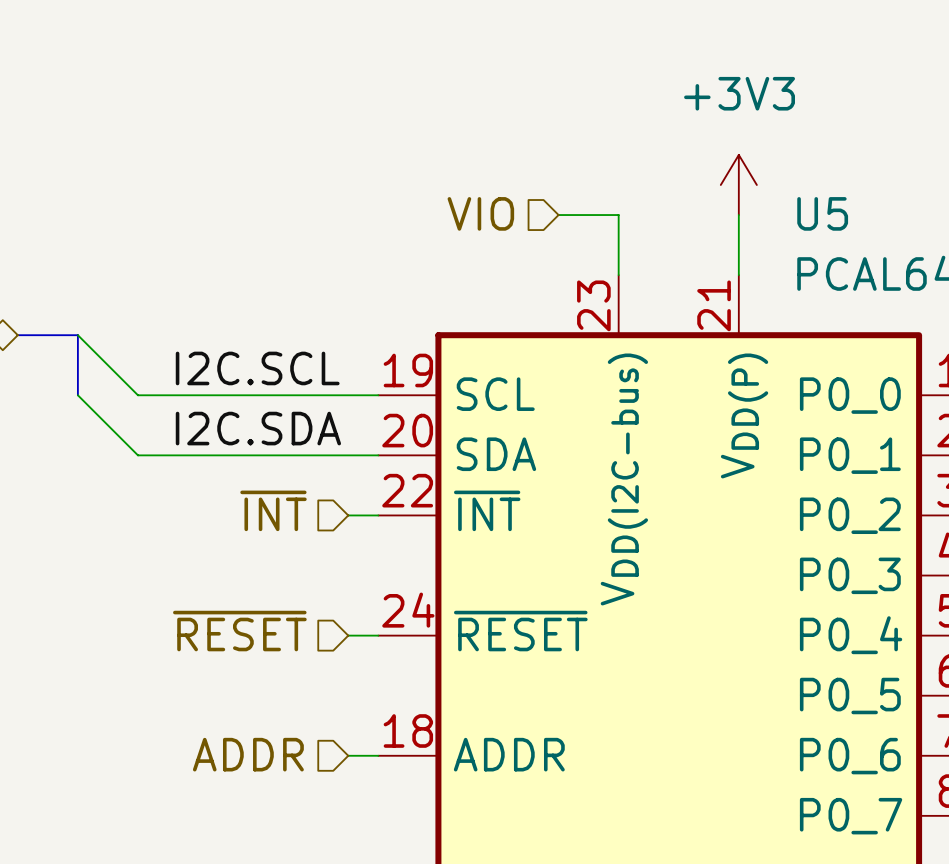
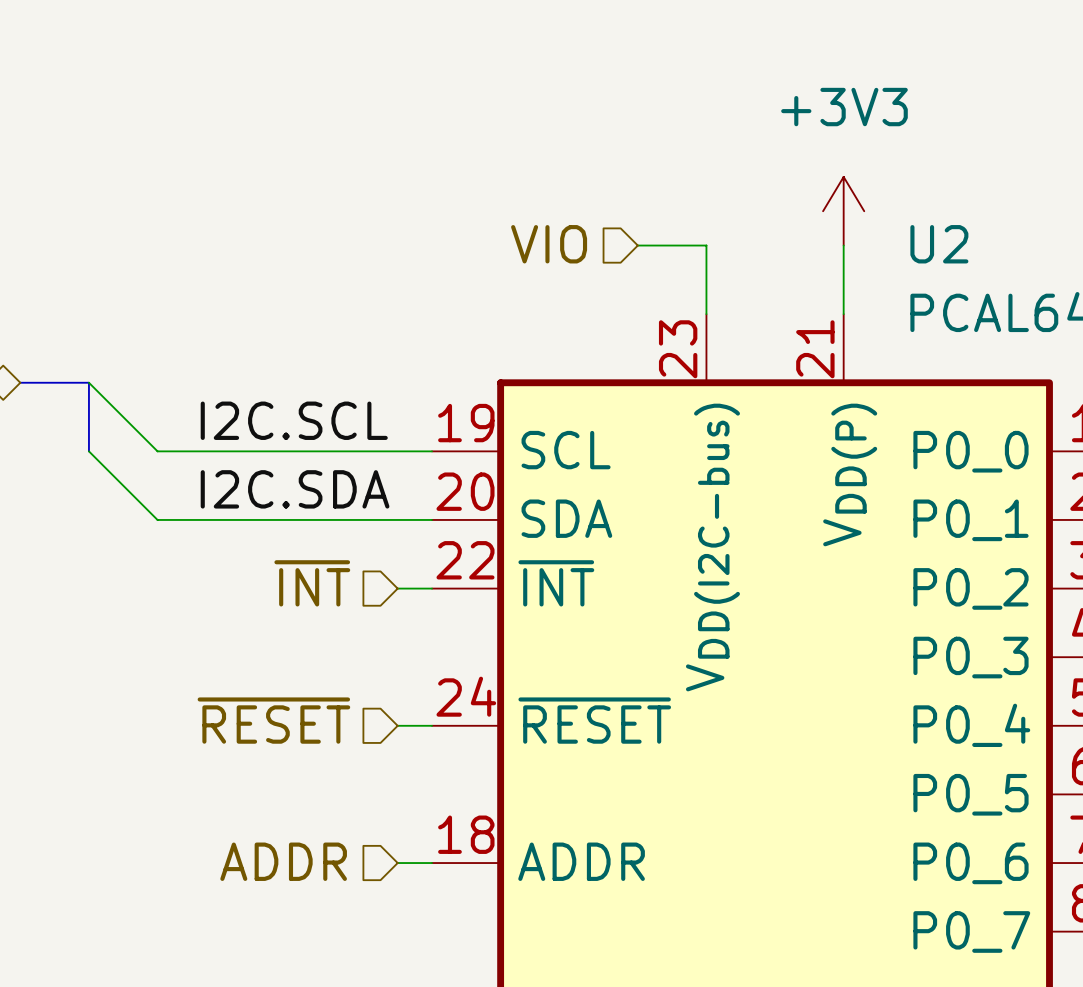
U5 name: U5 (822, 213) -> U2 (939, 244)

